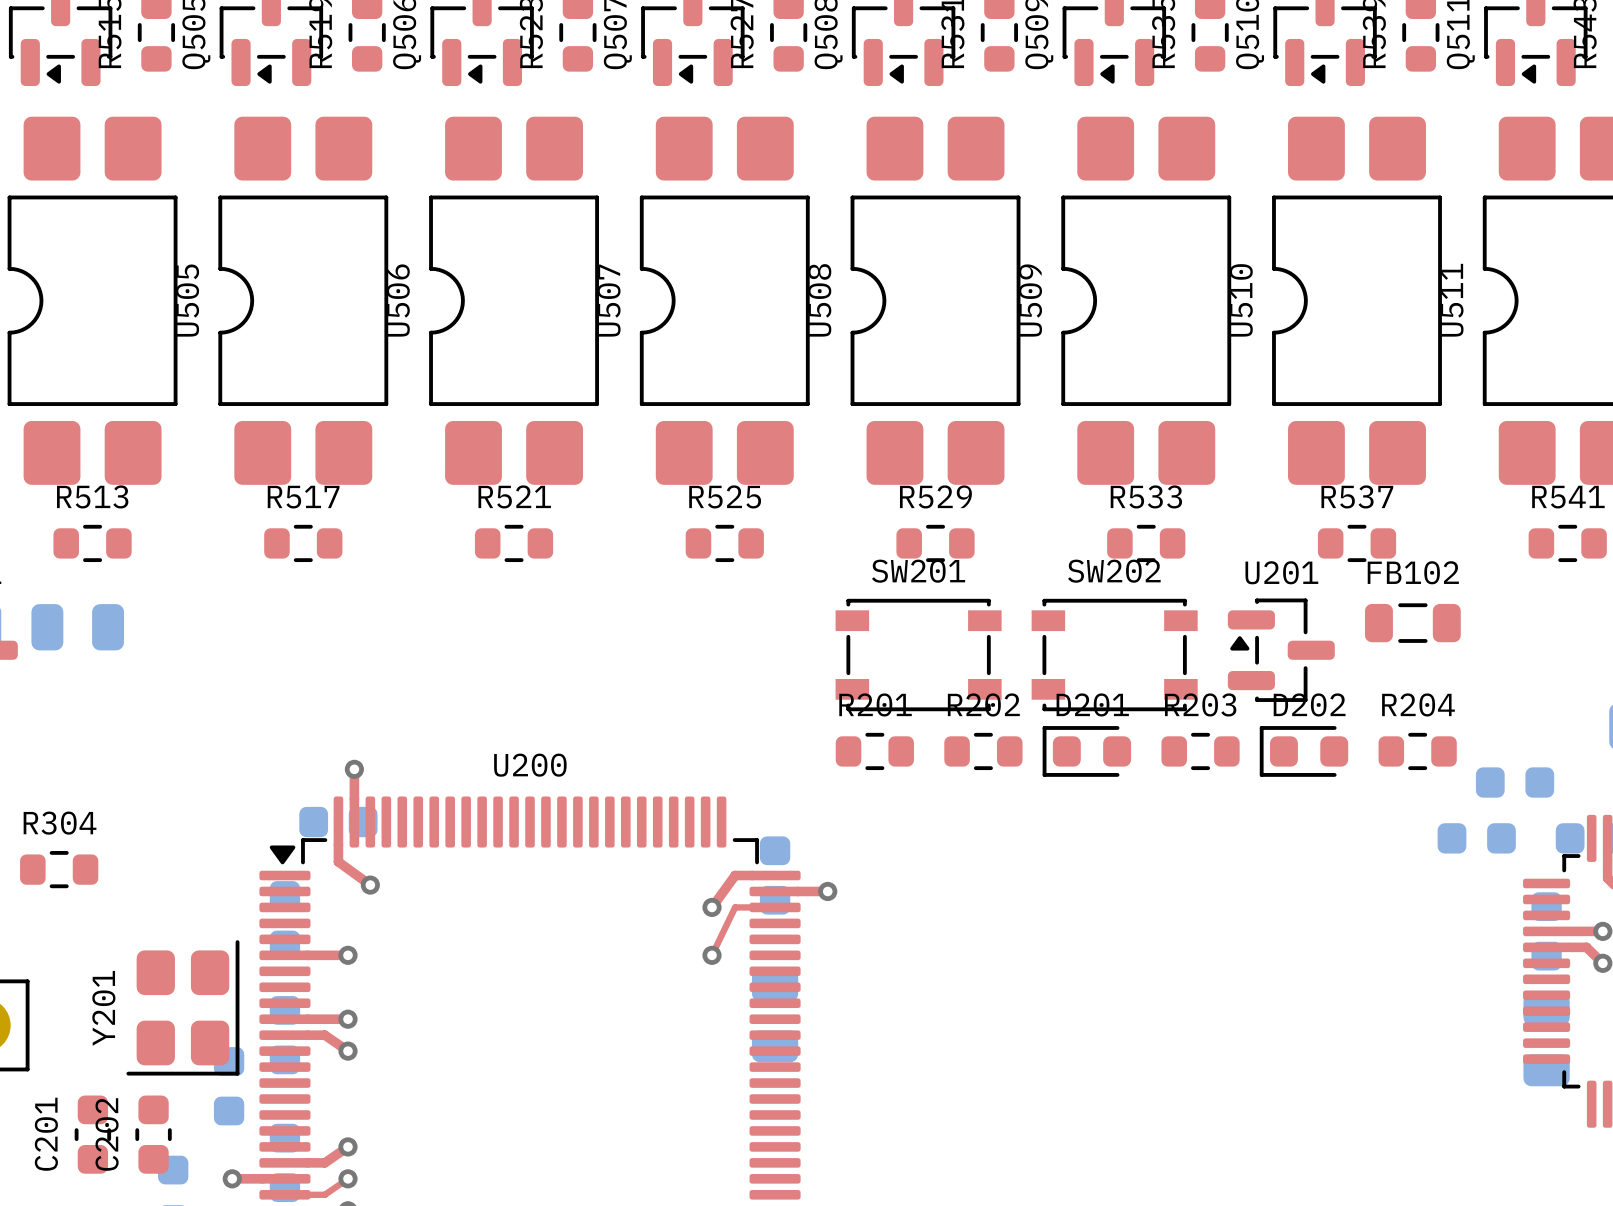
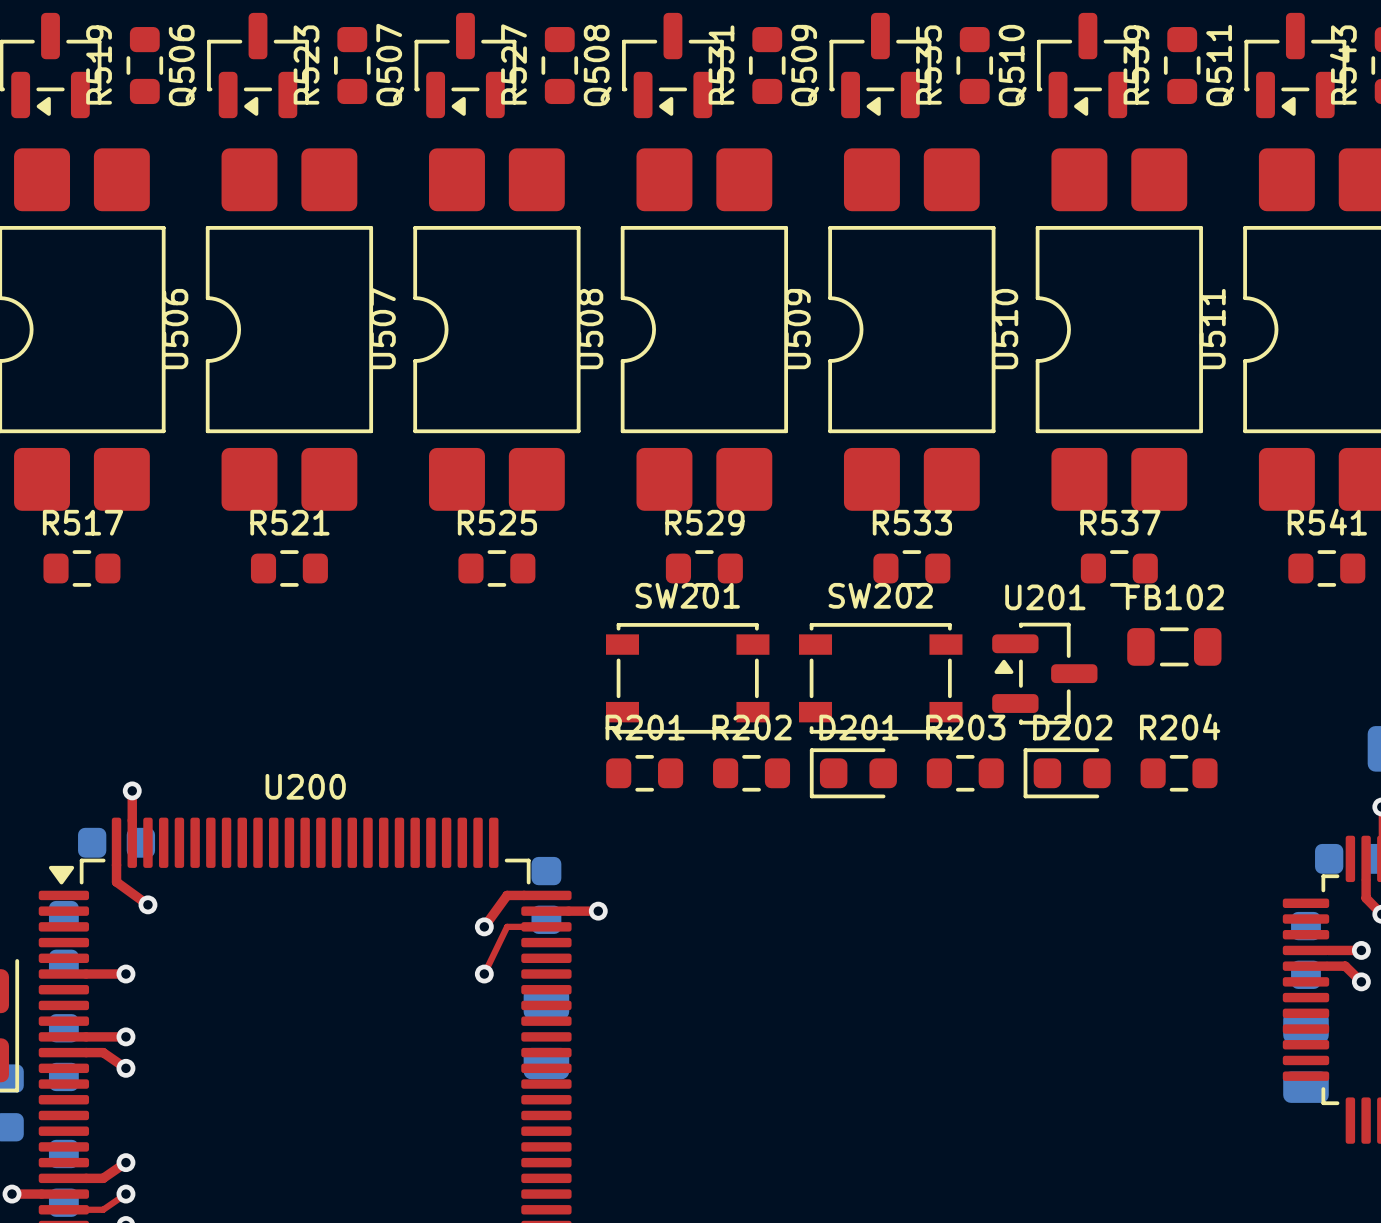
part: (1515, 782) -> none
part: (1476, 838) -> none

